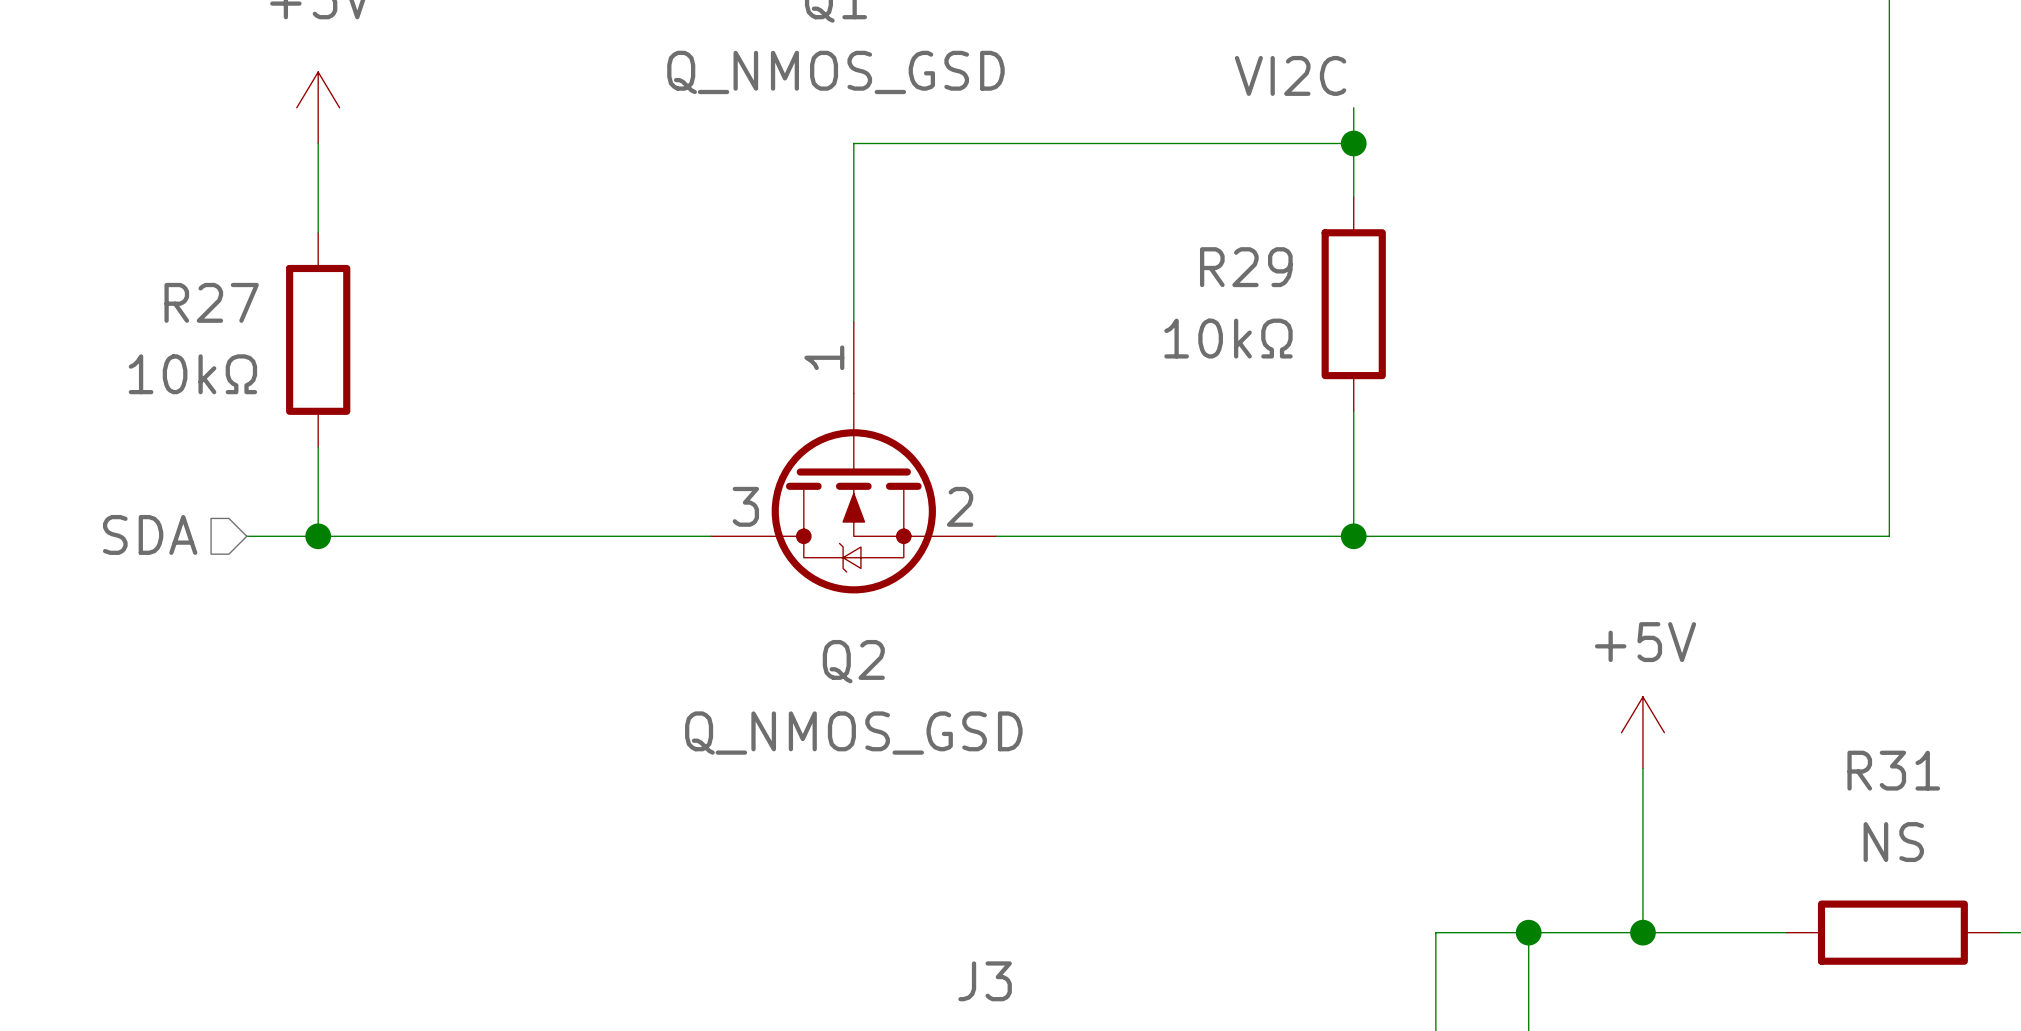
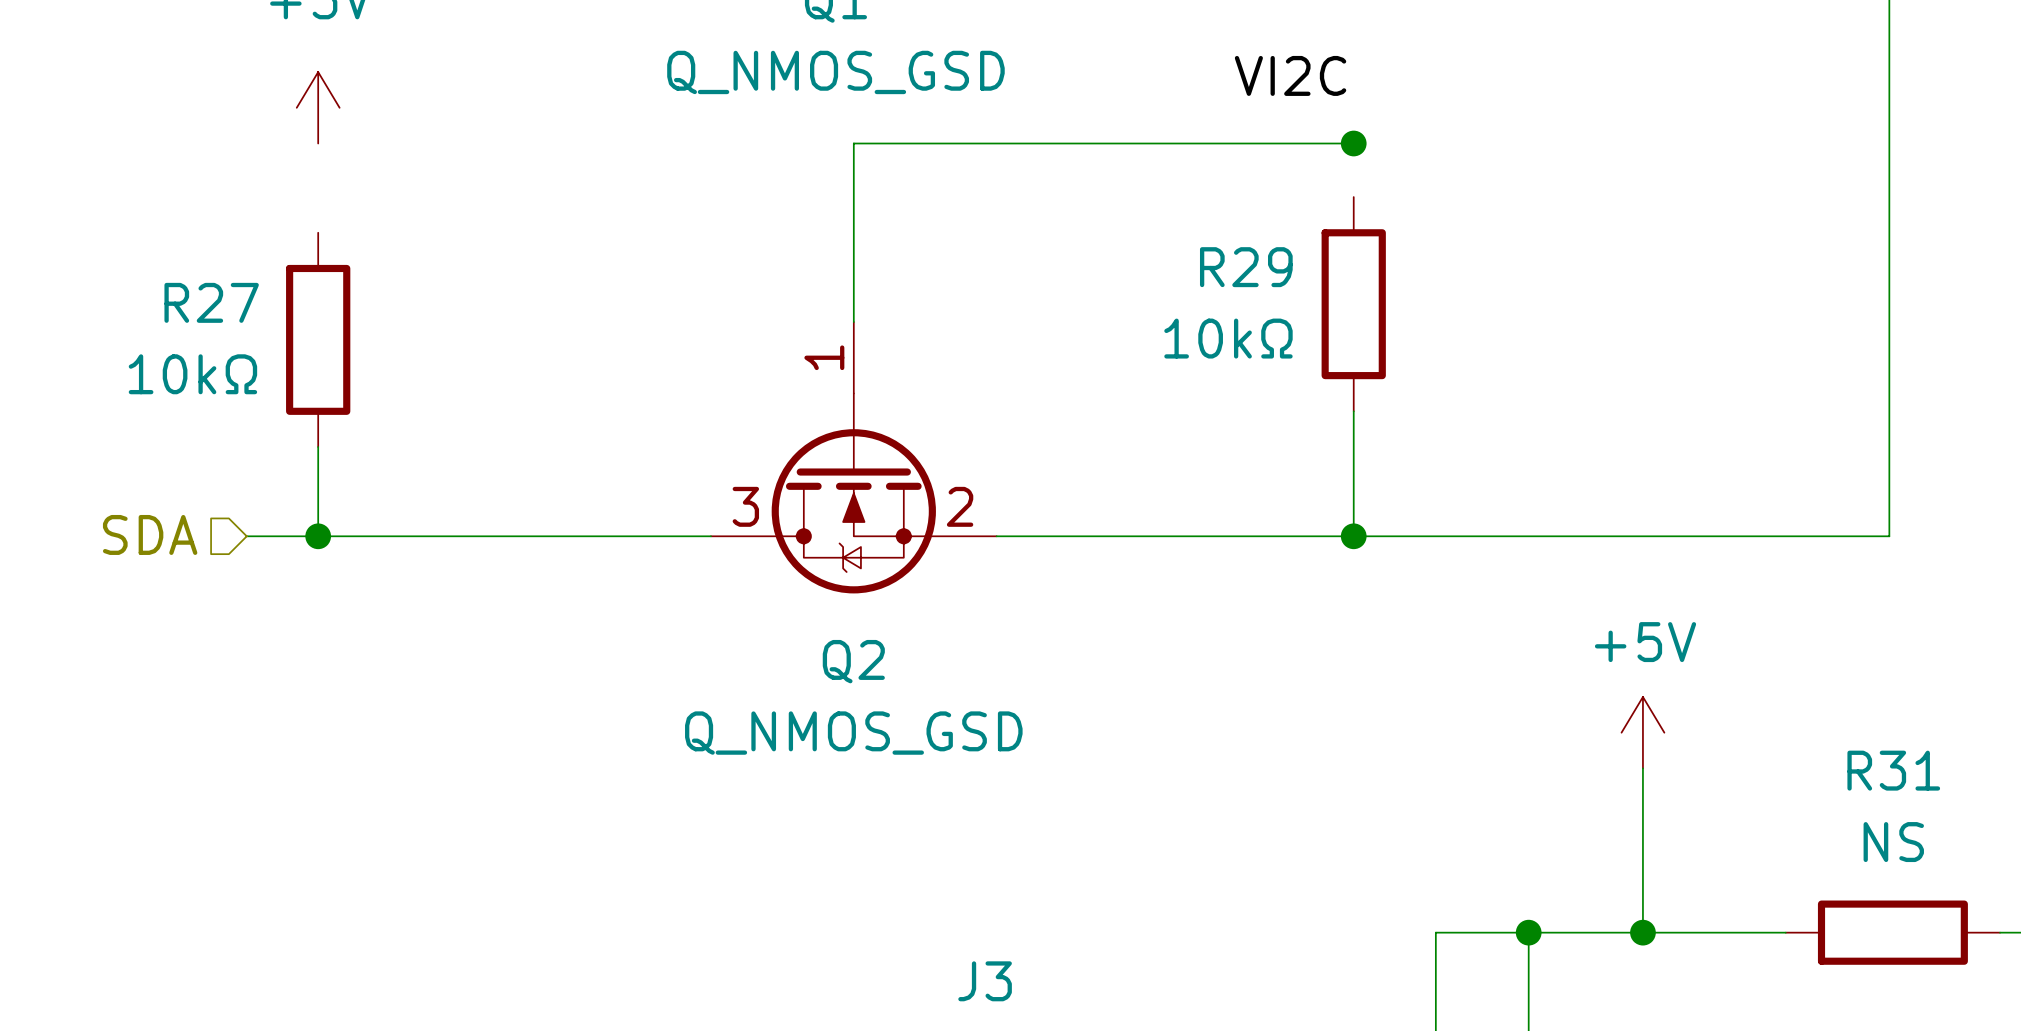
wire: (1353, 107) (1353, 197) -> none
wire: (318, 143) (318, 232) -> none

